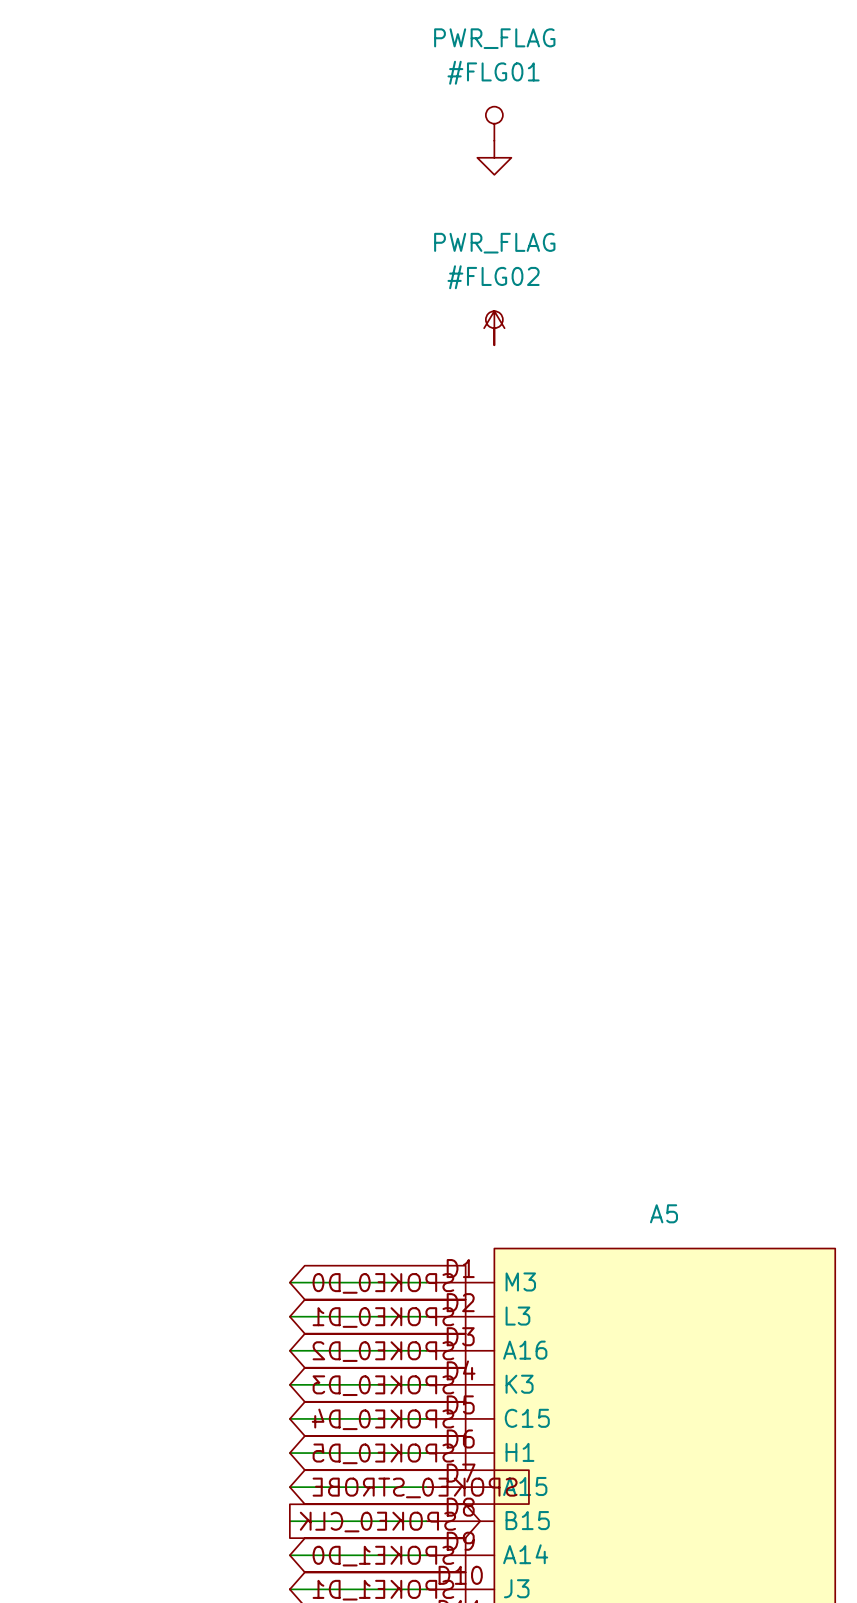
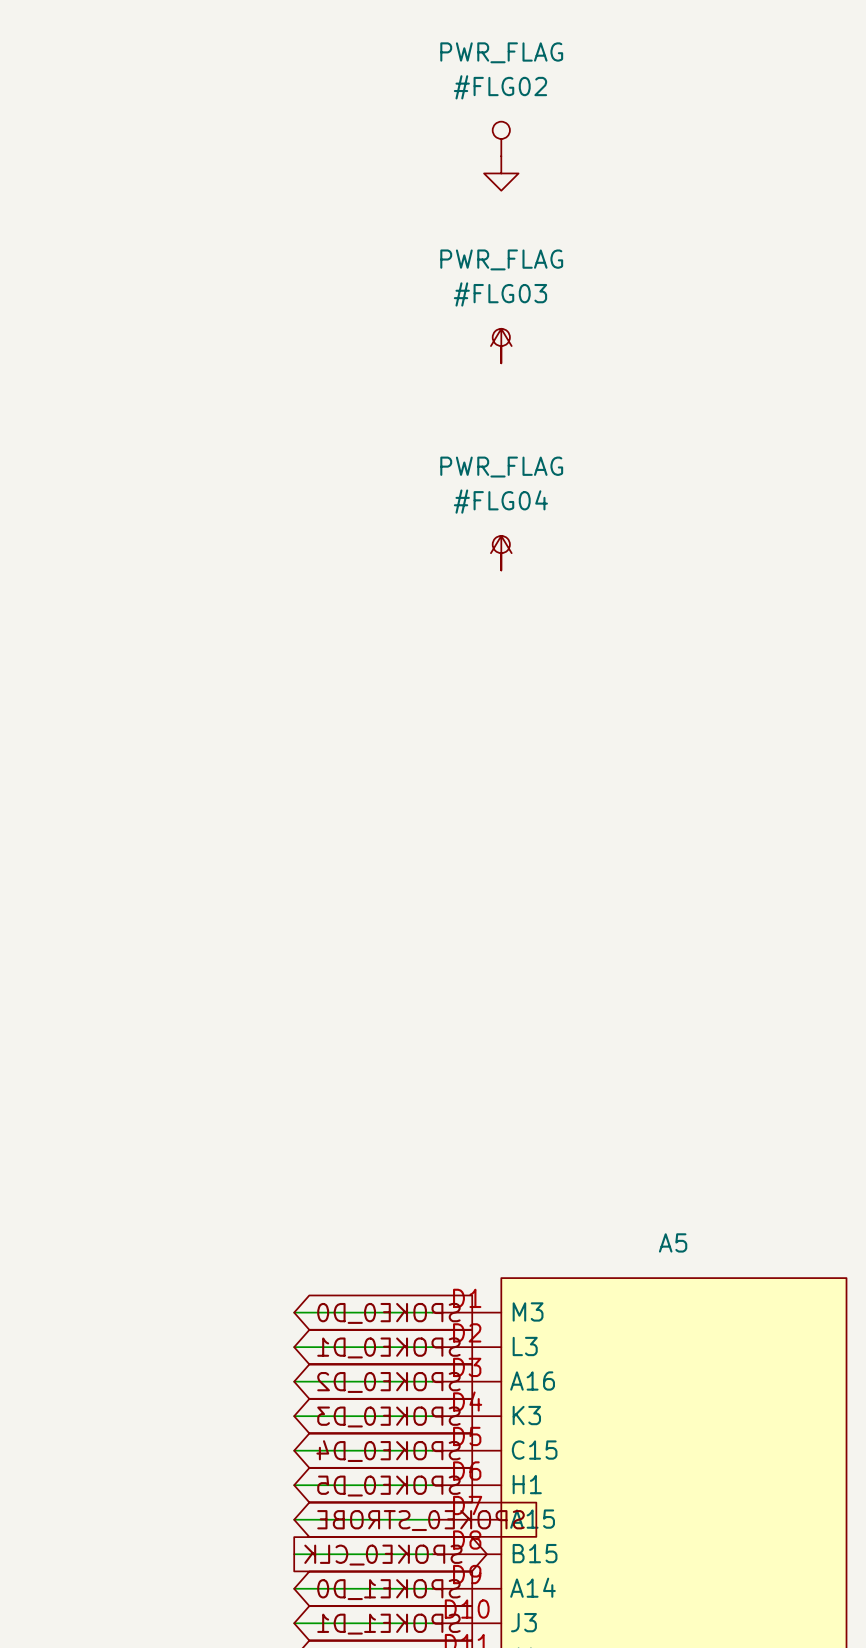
#FLG01 name: #FLG01 (493, 72) -> #FLG02 (500, 87)
#FLG02 name: #FLG02 (493, 277) -> #FLG03 (500, 294)
power symbol: none -> (501, 553)
#FLG04: none -> PWR_FLAG (501, 553)

